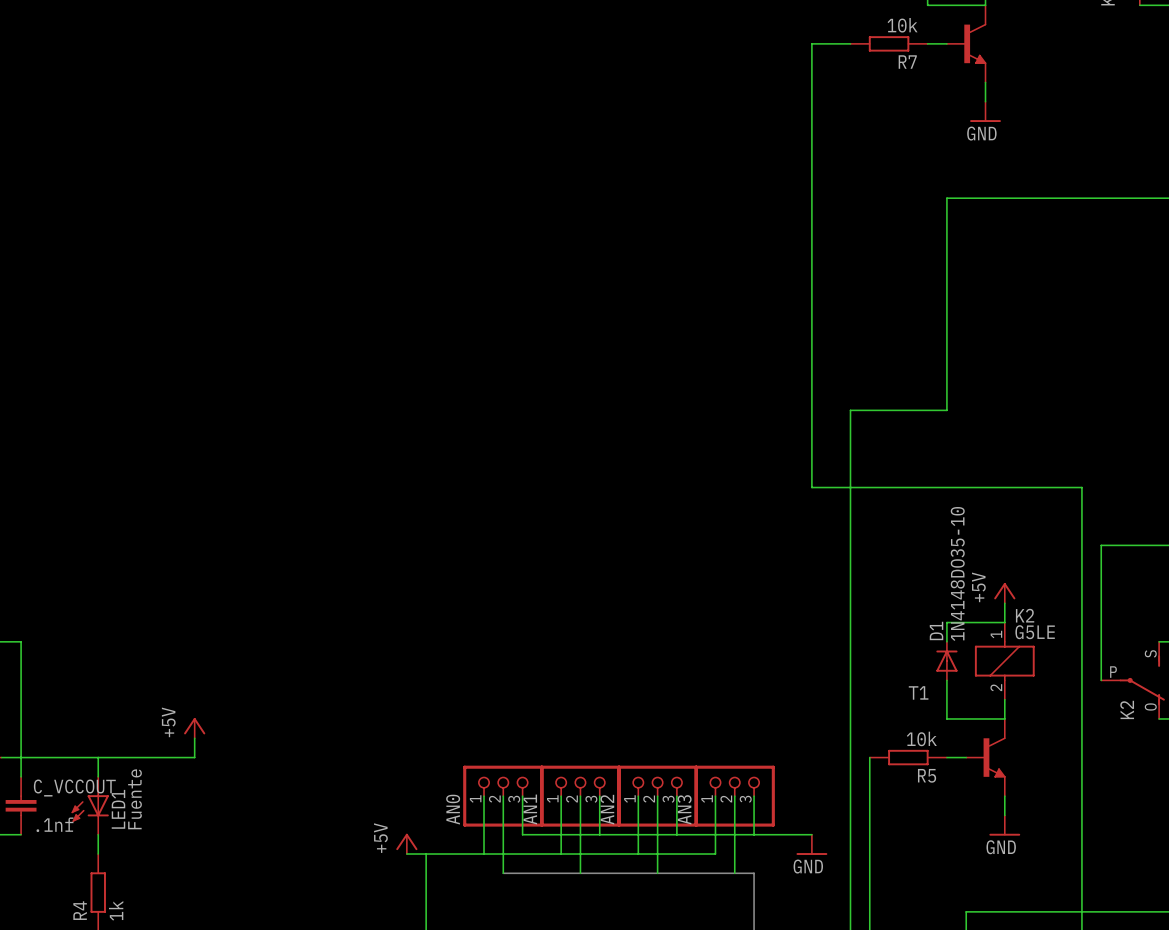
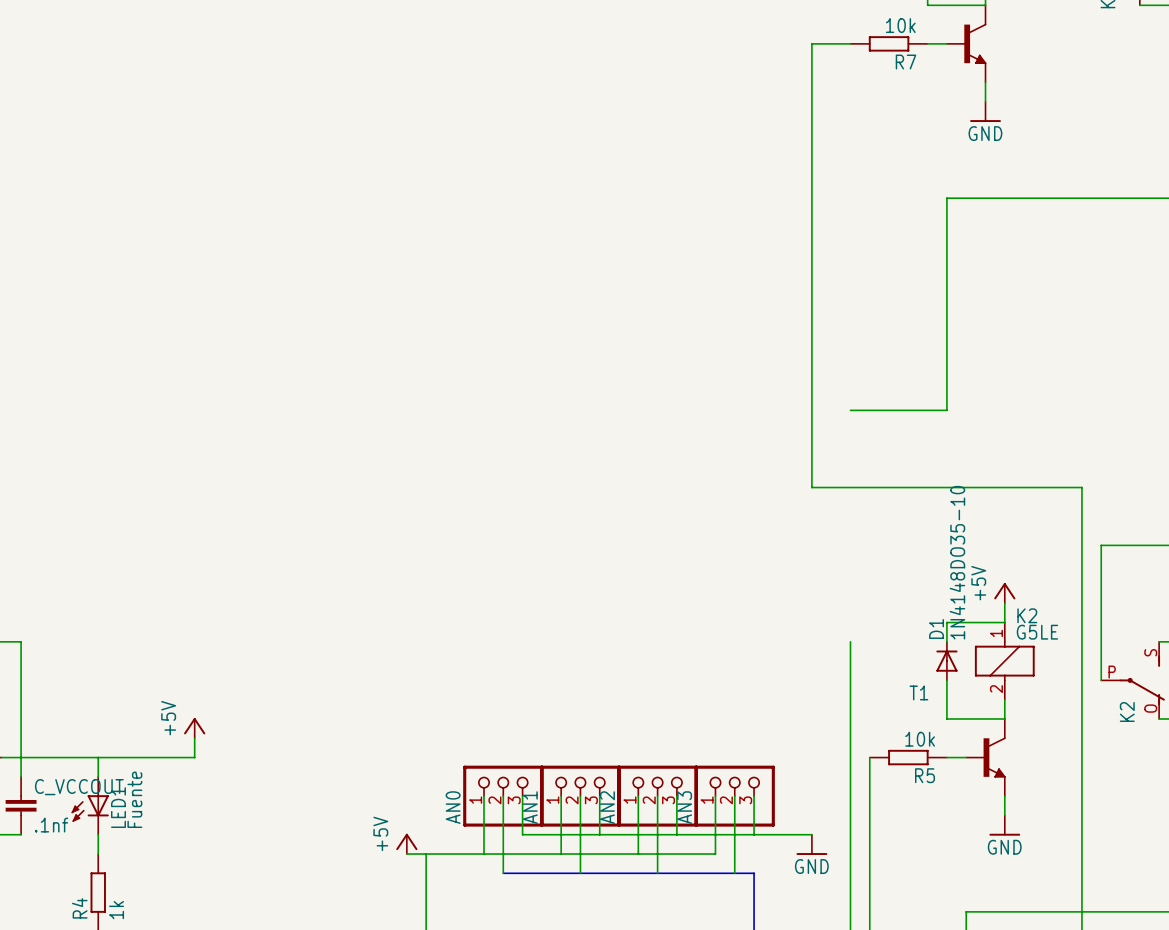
wire: (850, 410) (850, 641) -> none

